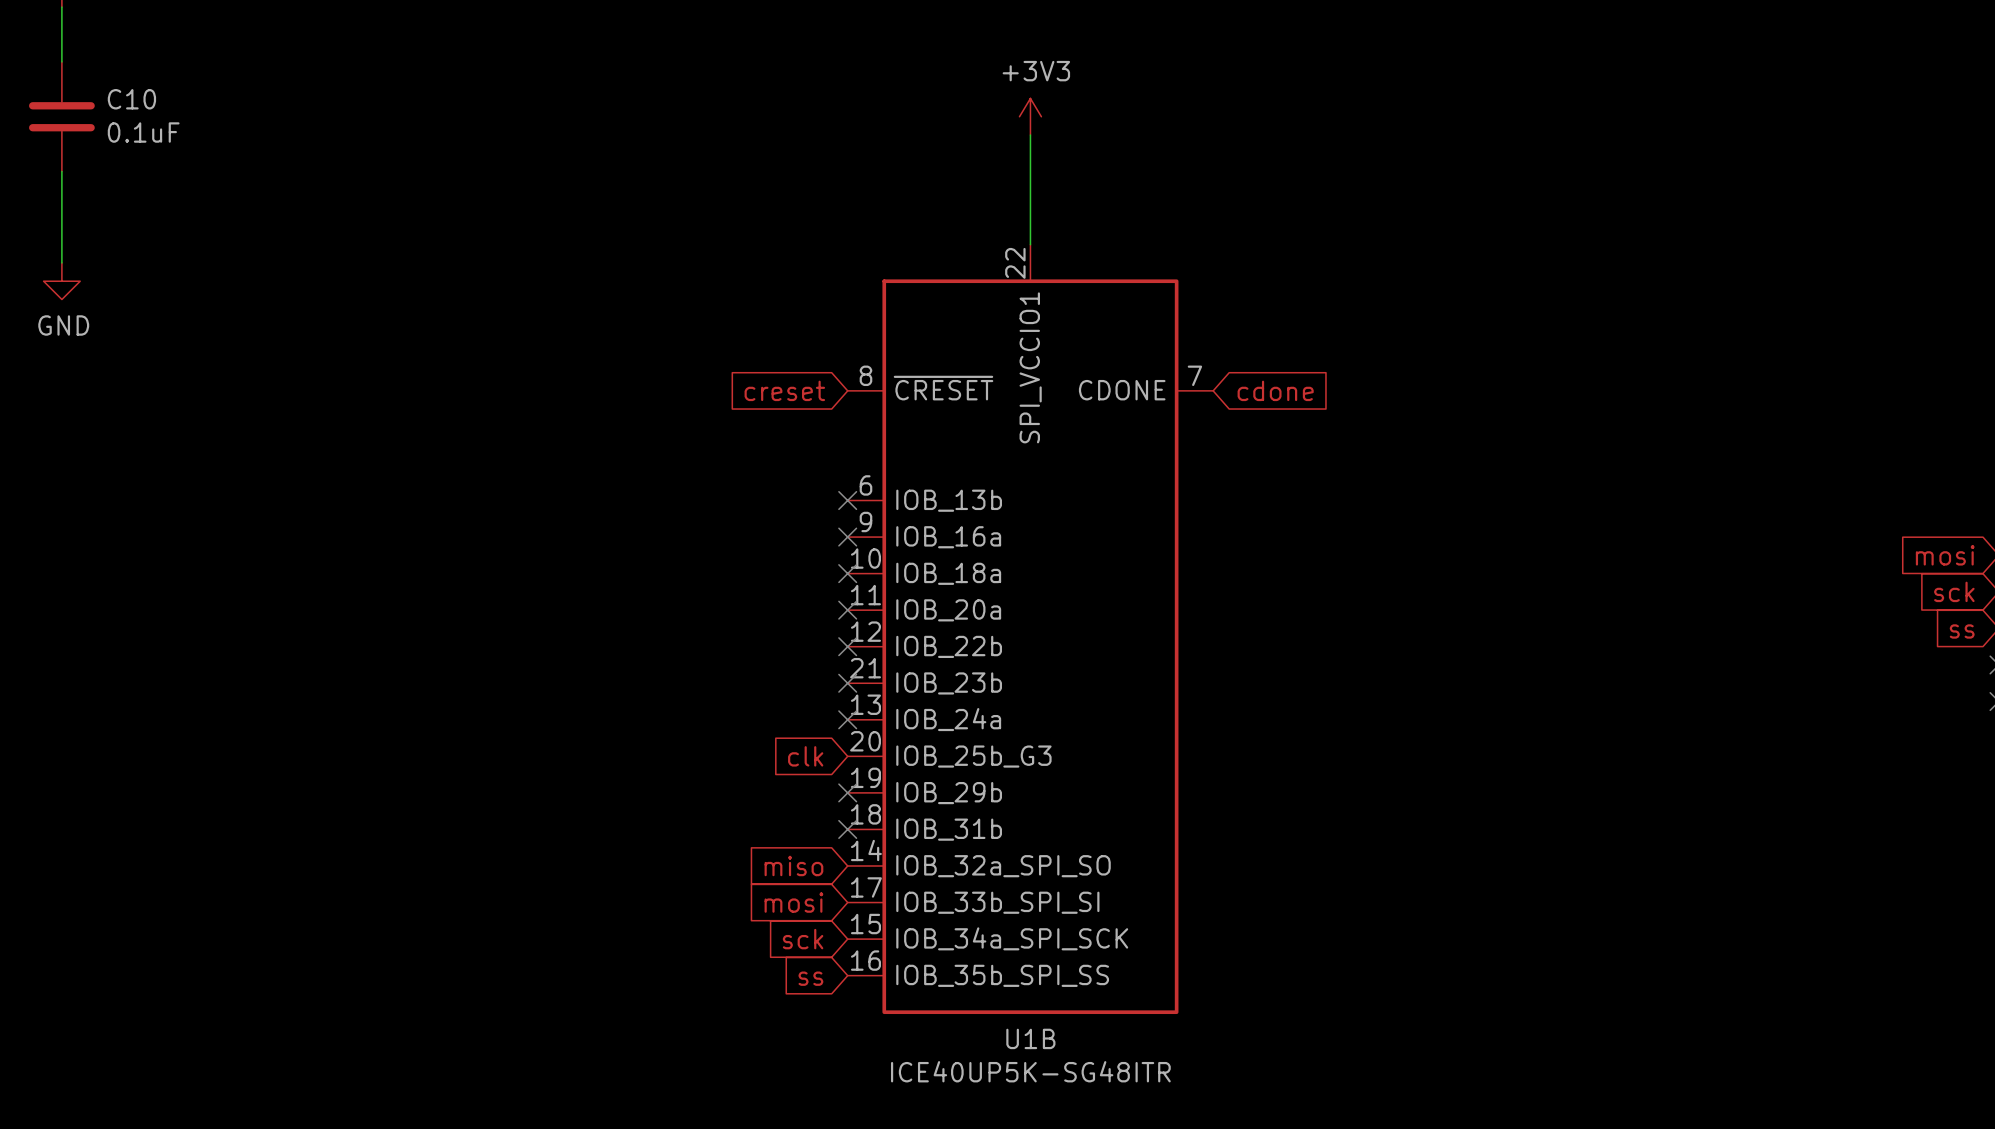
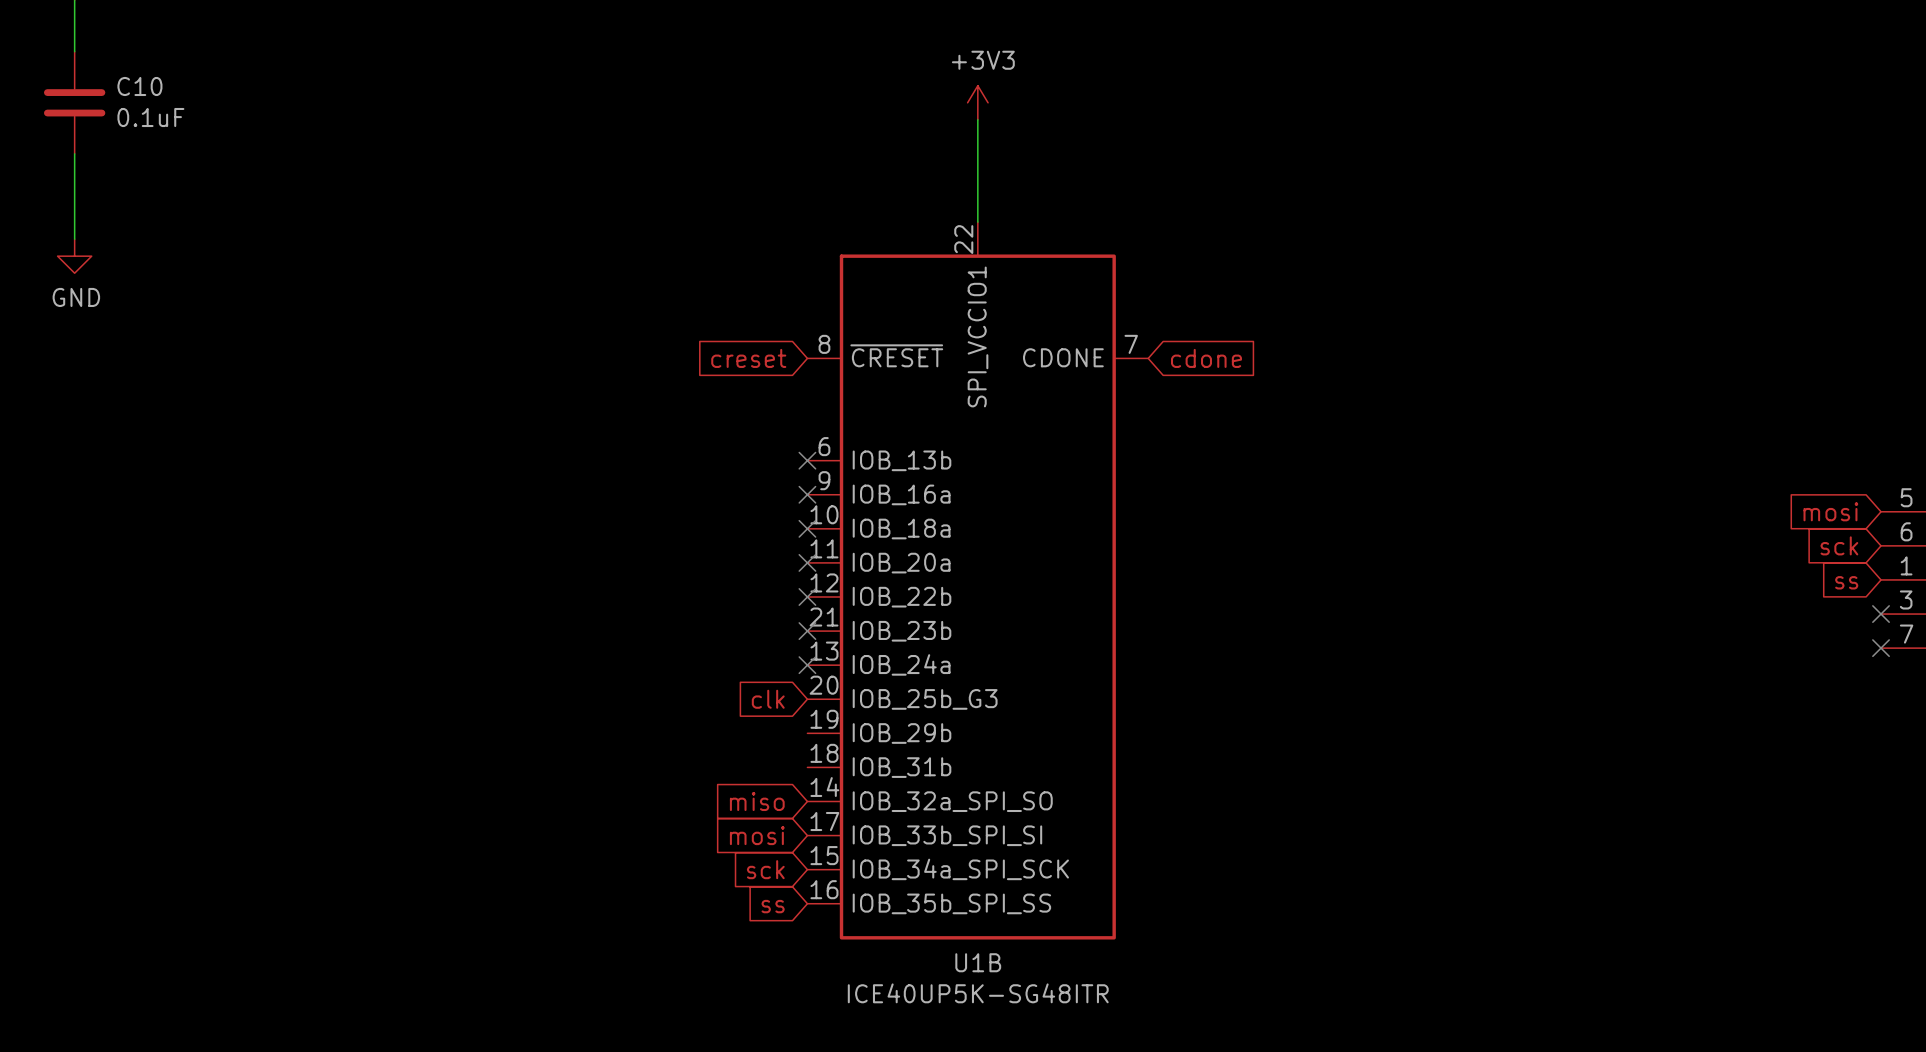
no-connect mark: (847, 792) -> none
no-connect mark: (847, 829) -> none

